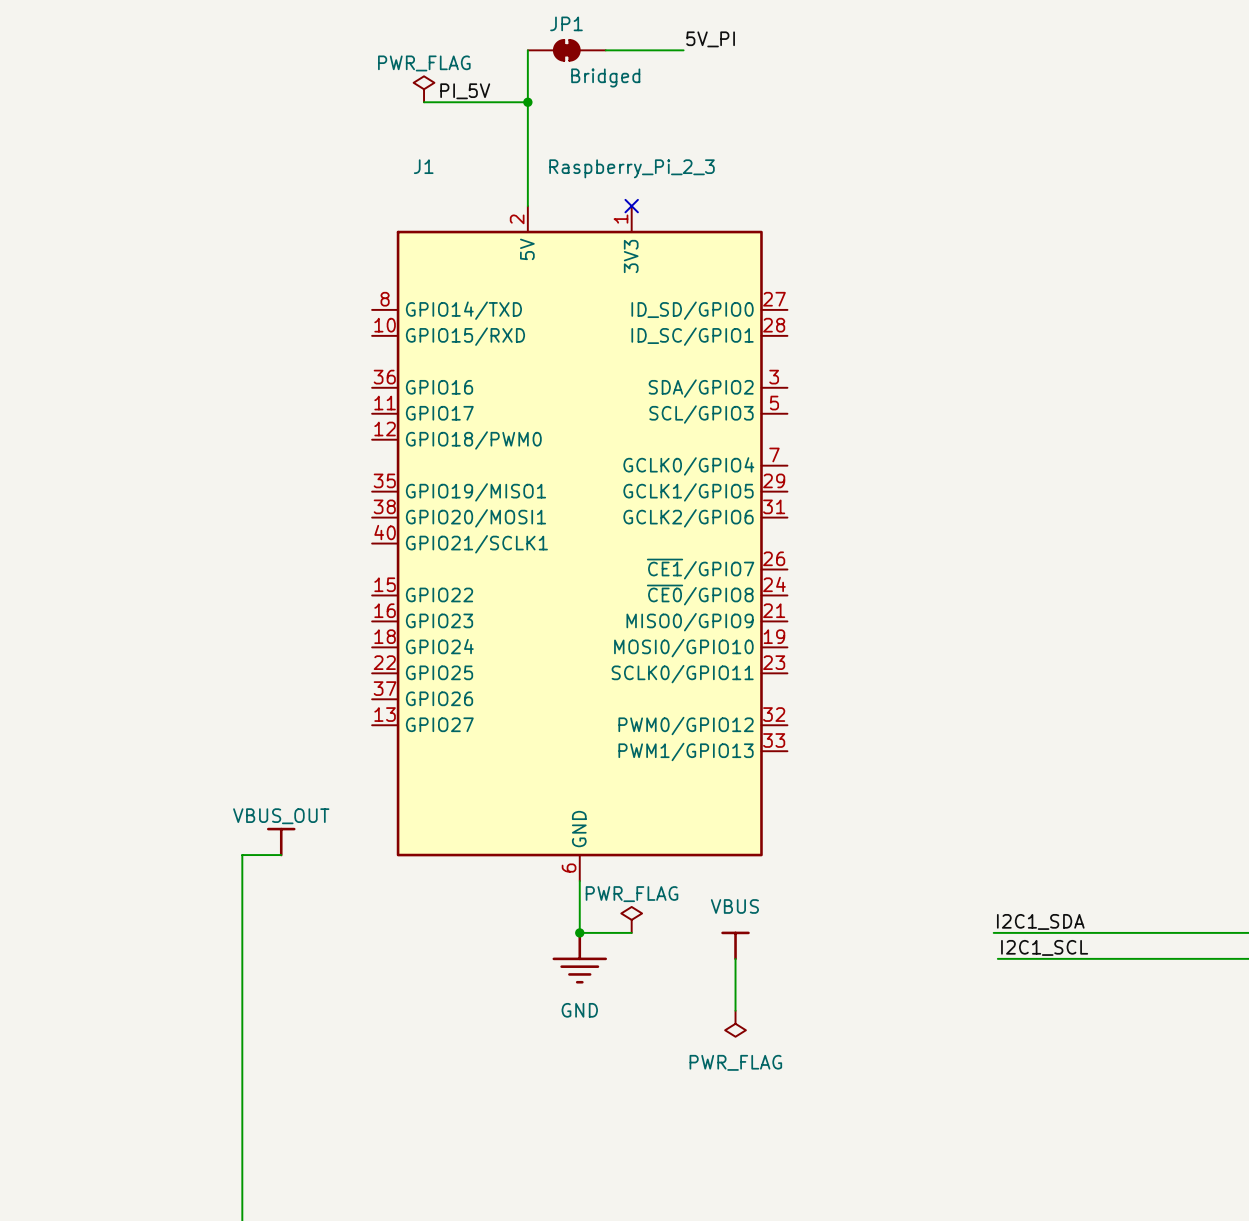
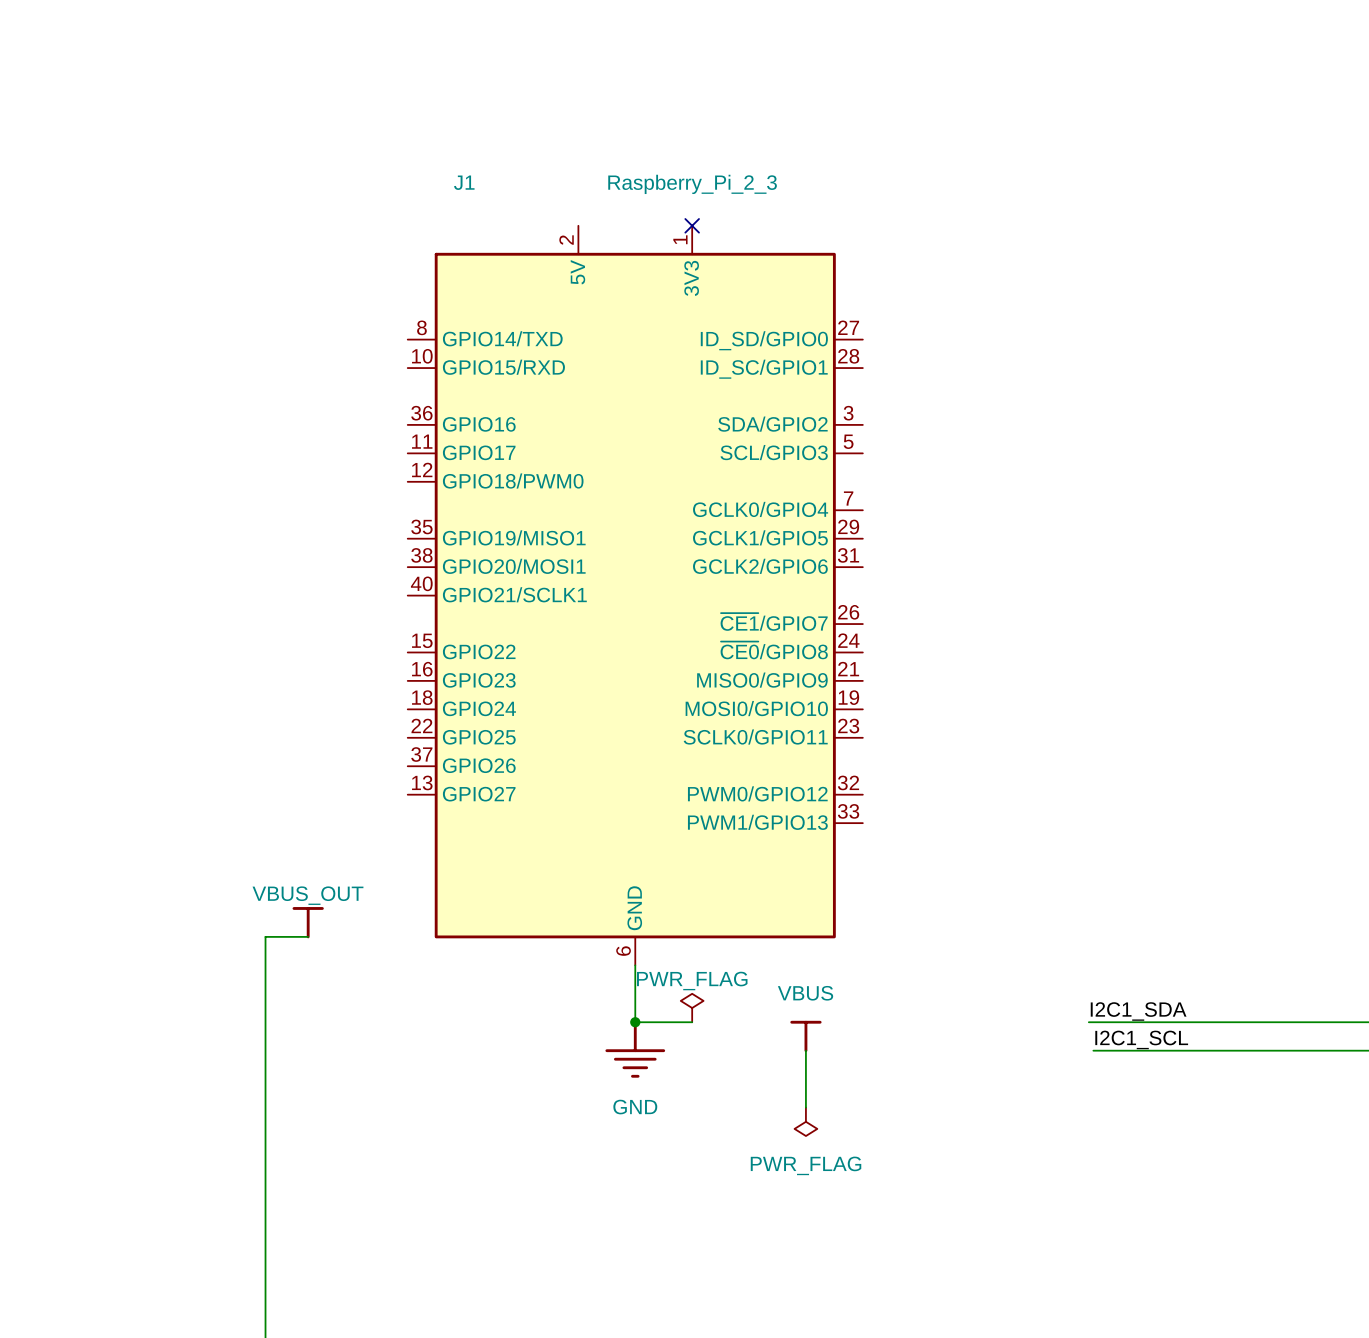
label: 5V_PI (710, 39) -> none
wire: (527, 50) (527, 206) -> none
JP1: Bridged (566, 50) -> none
wire: (605, 50) (683, 50) -> none
power symbol: PWR_FLAG (424, 89) -> none
label: PI_5V (465, 91) -> none
wire: (424, 102) (527, 102) -> none
junction: (527, 102) -> none

